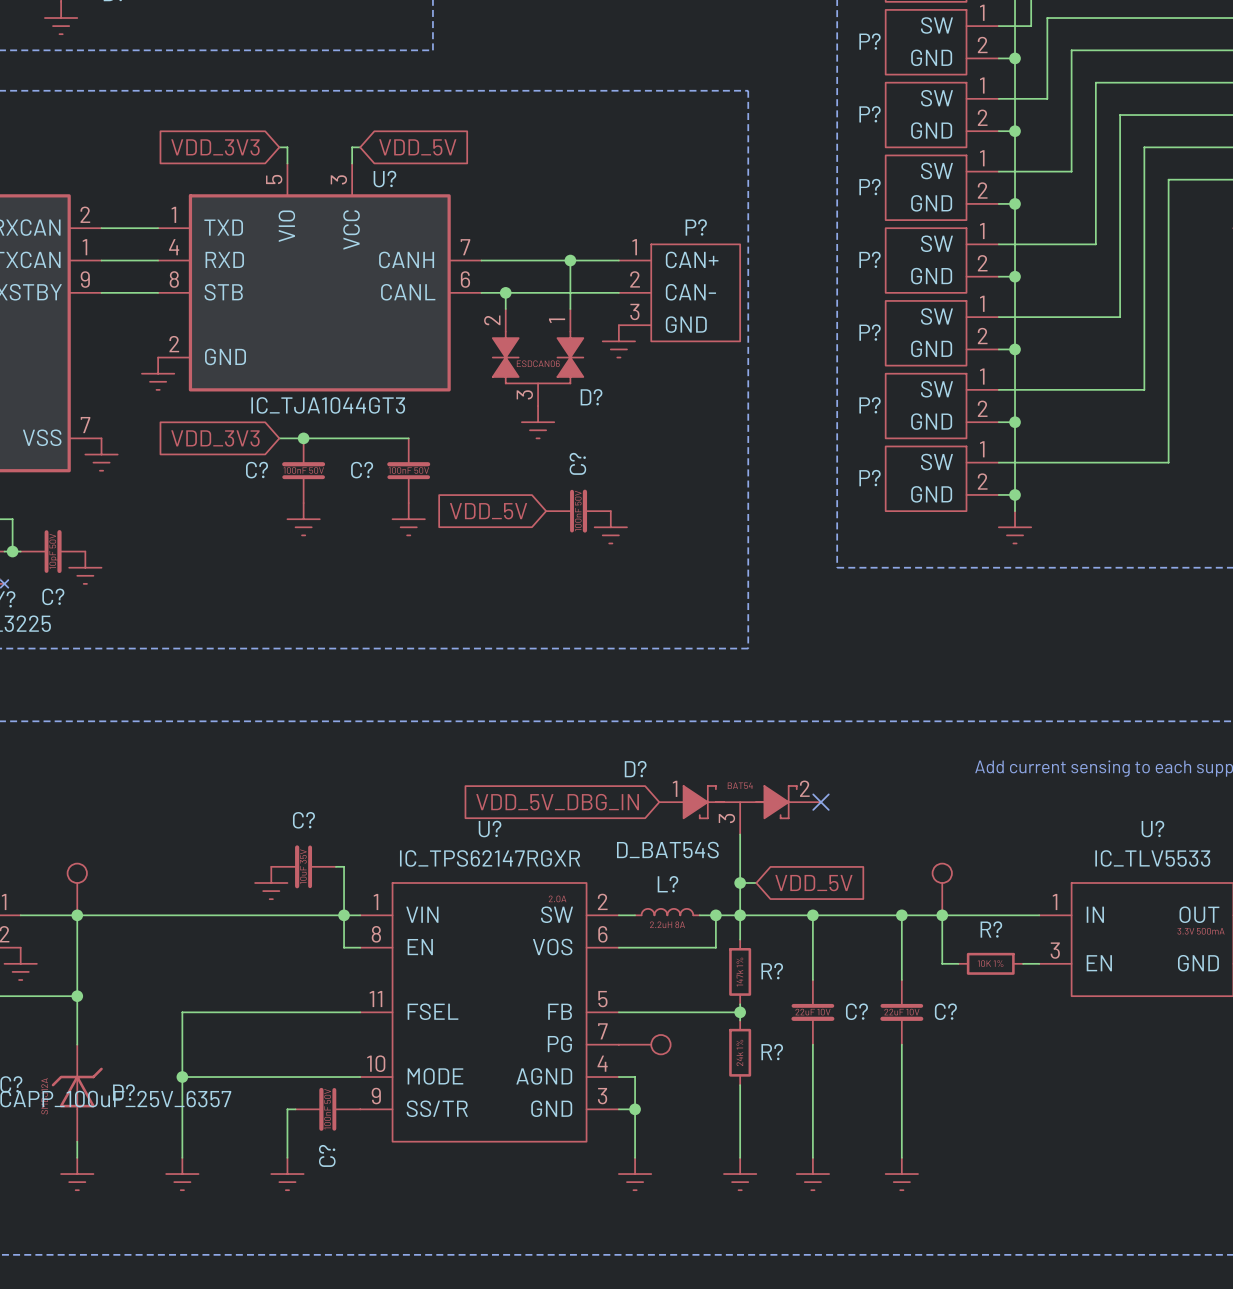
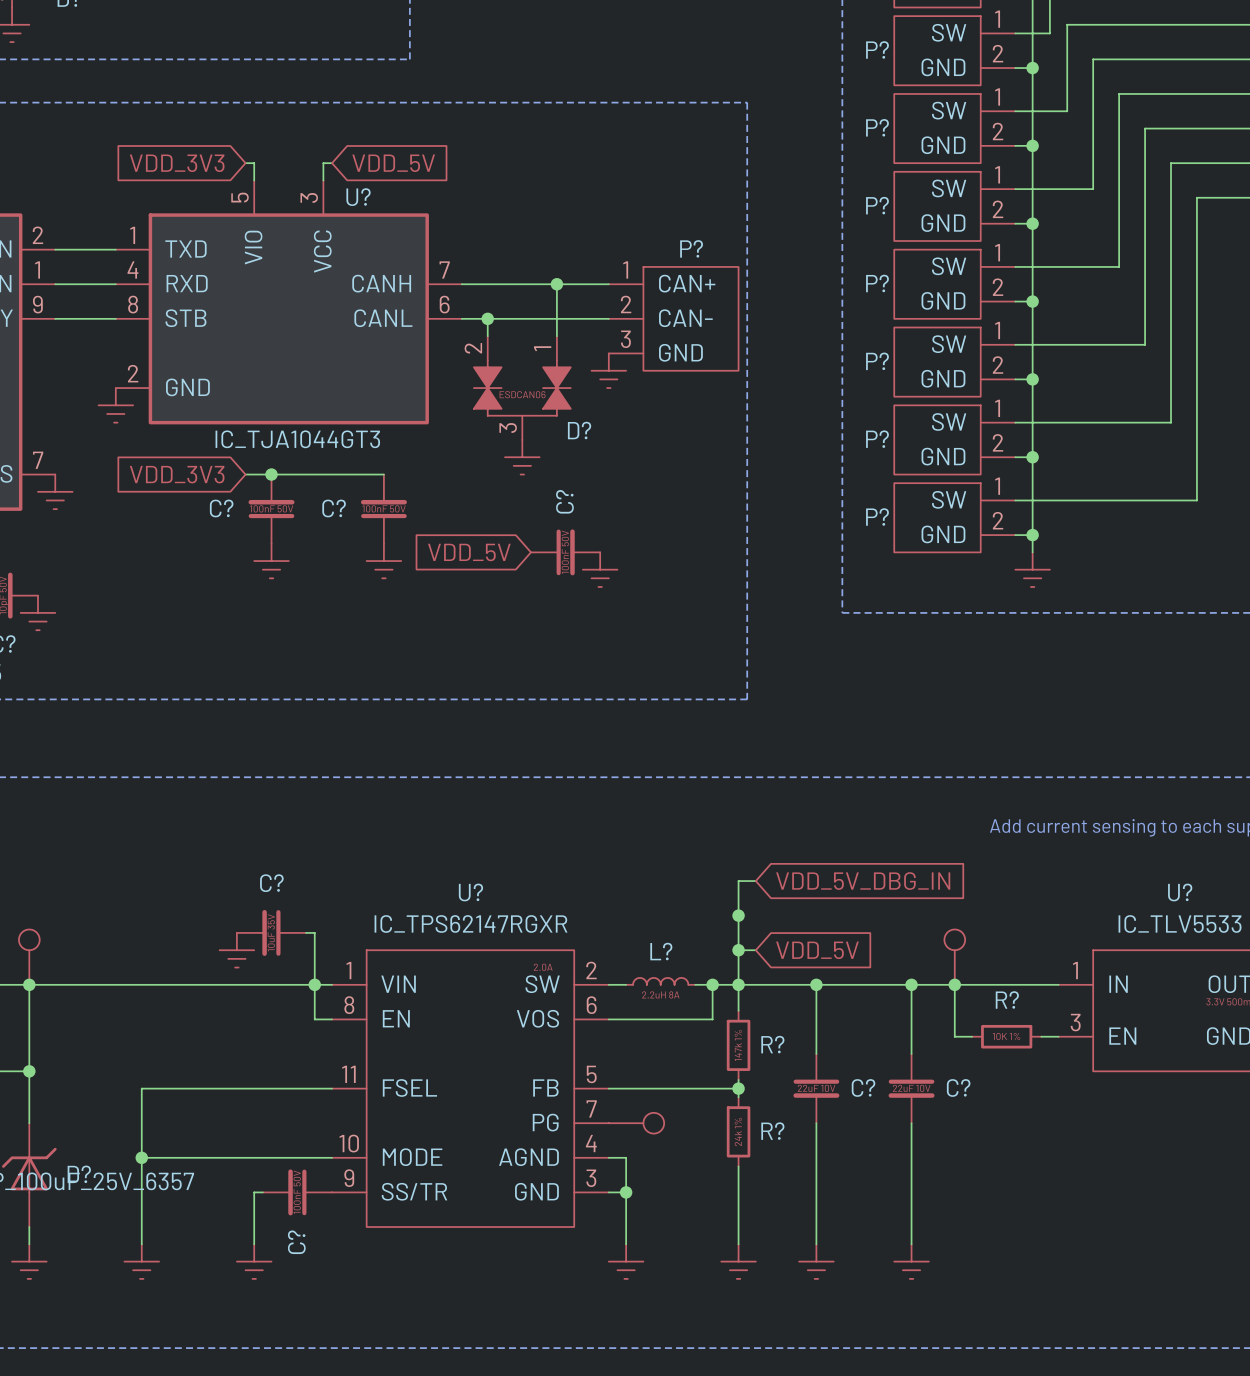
global label rotation: 0° (557, 802) -> 180° (863, 881)
global label position: VDD_5V_DBG_IN (557, 802) -> VDD_5V_DBG_IN (863, 881)
no-connect mark: (821, 802) -> none
D?: D_BAT54S (740, 810) -> none
wire: none -> (755, 881) (738, 881) (738, 898)
junction: none -> (738, 915)

